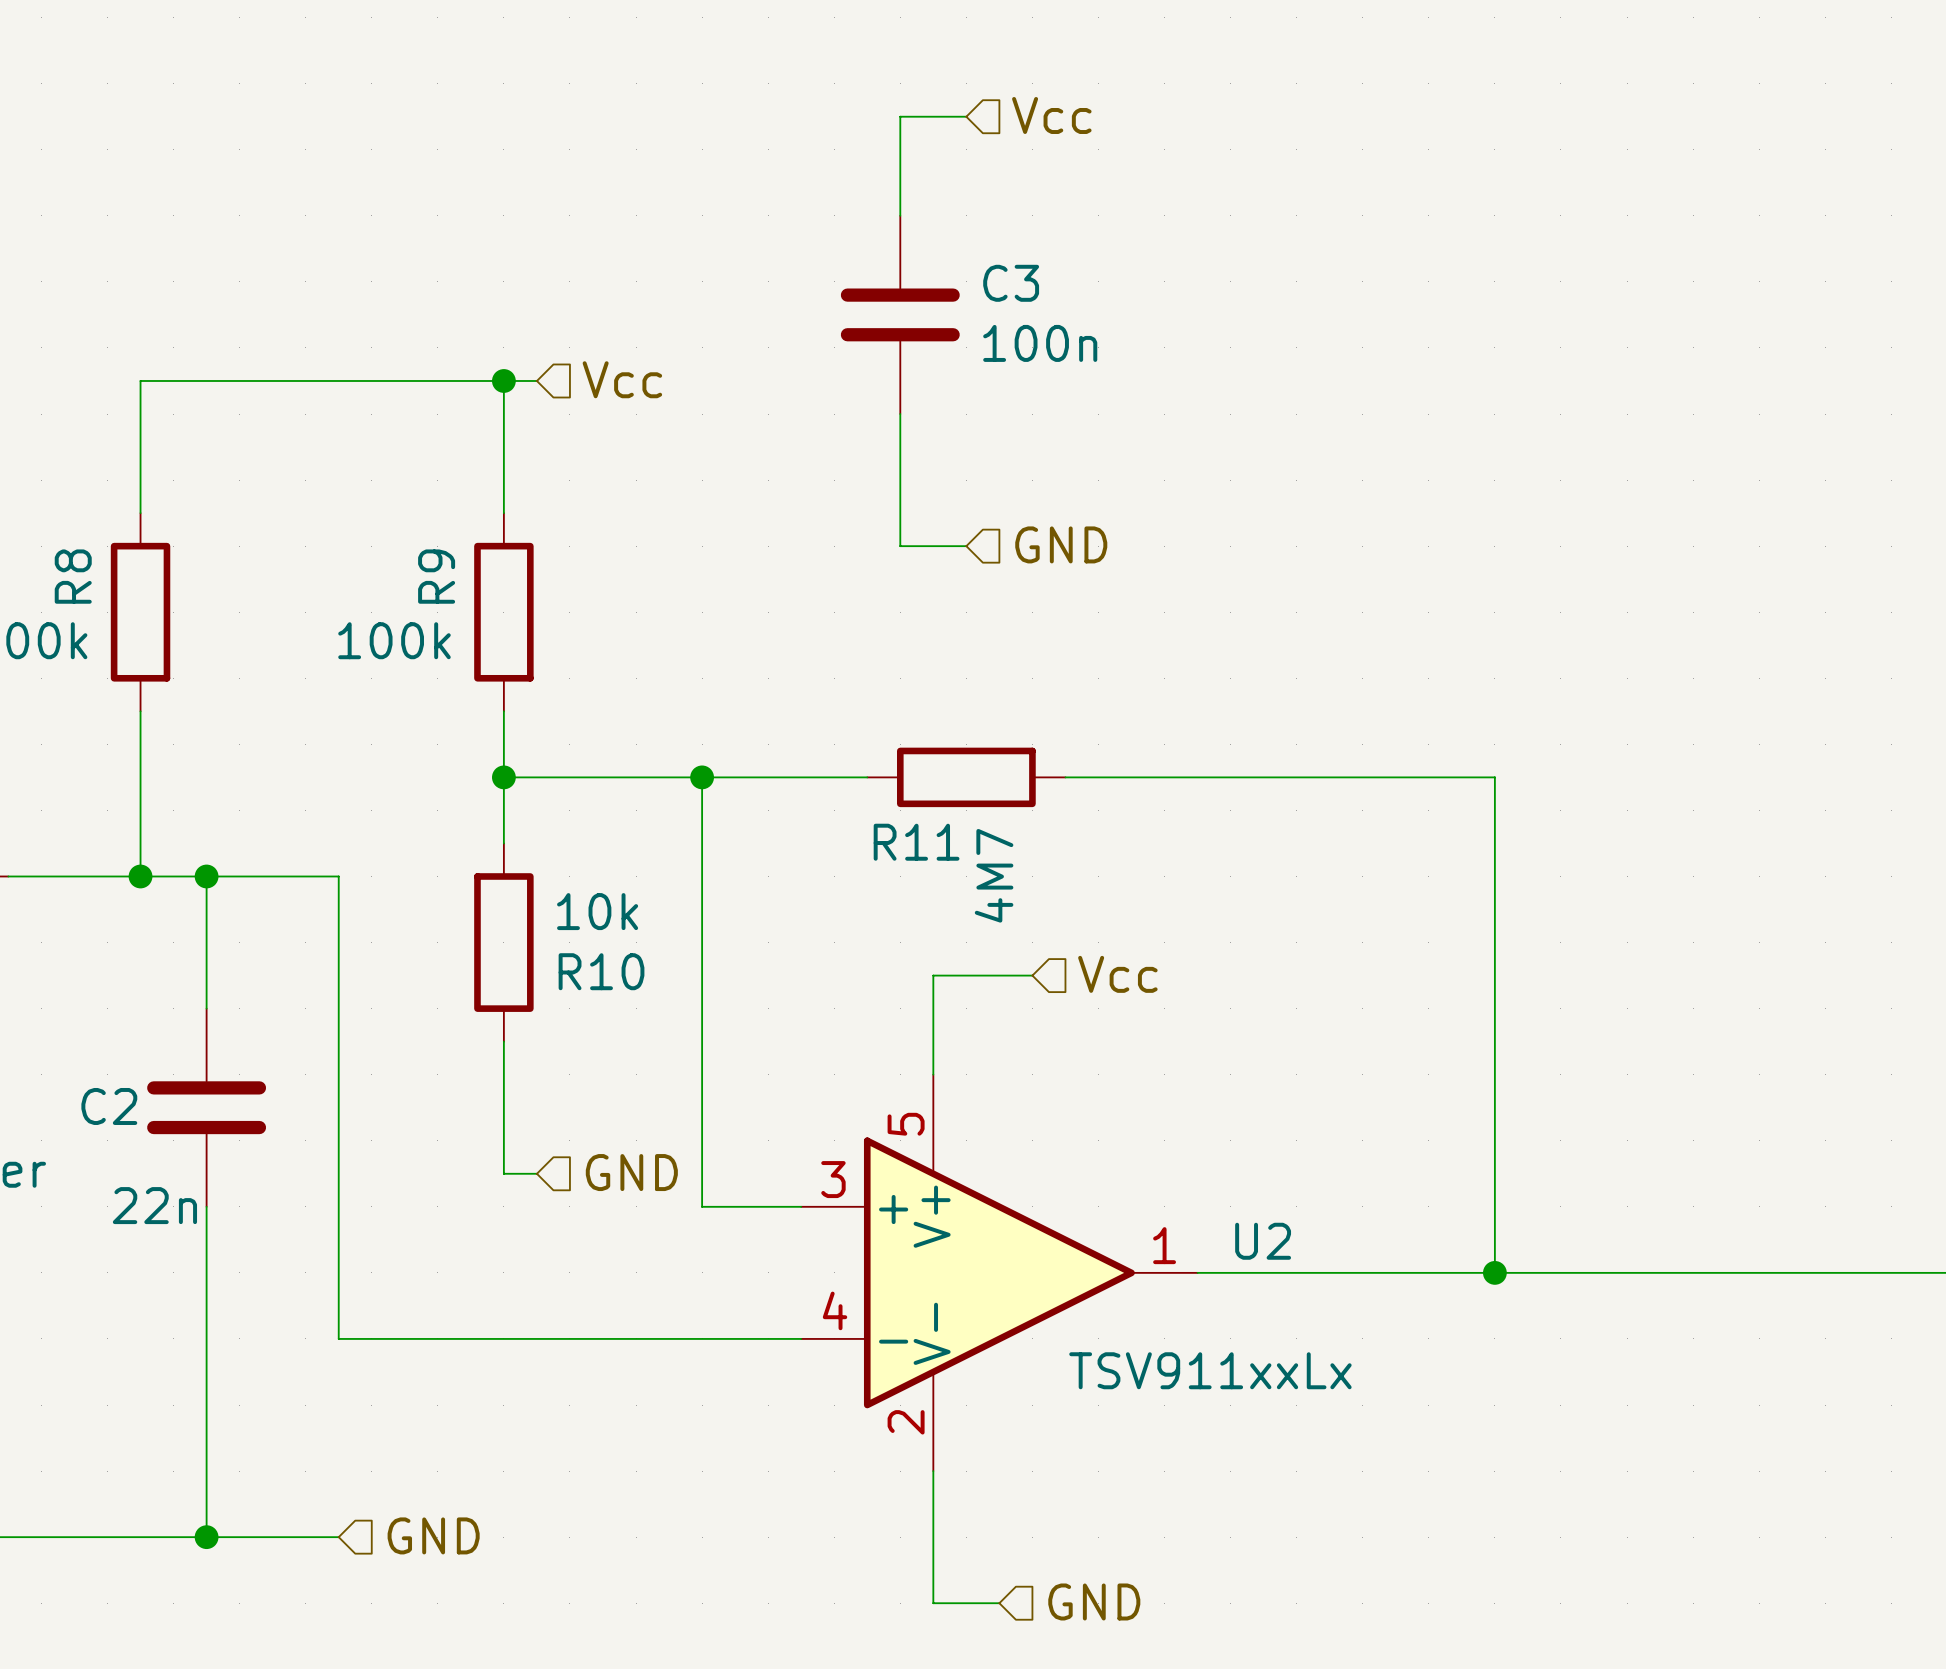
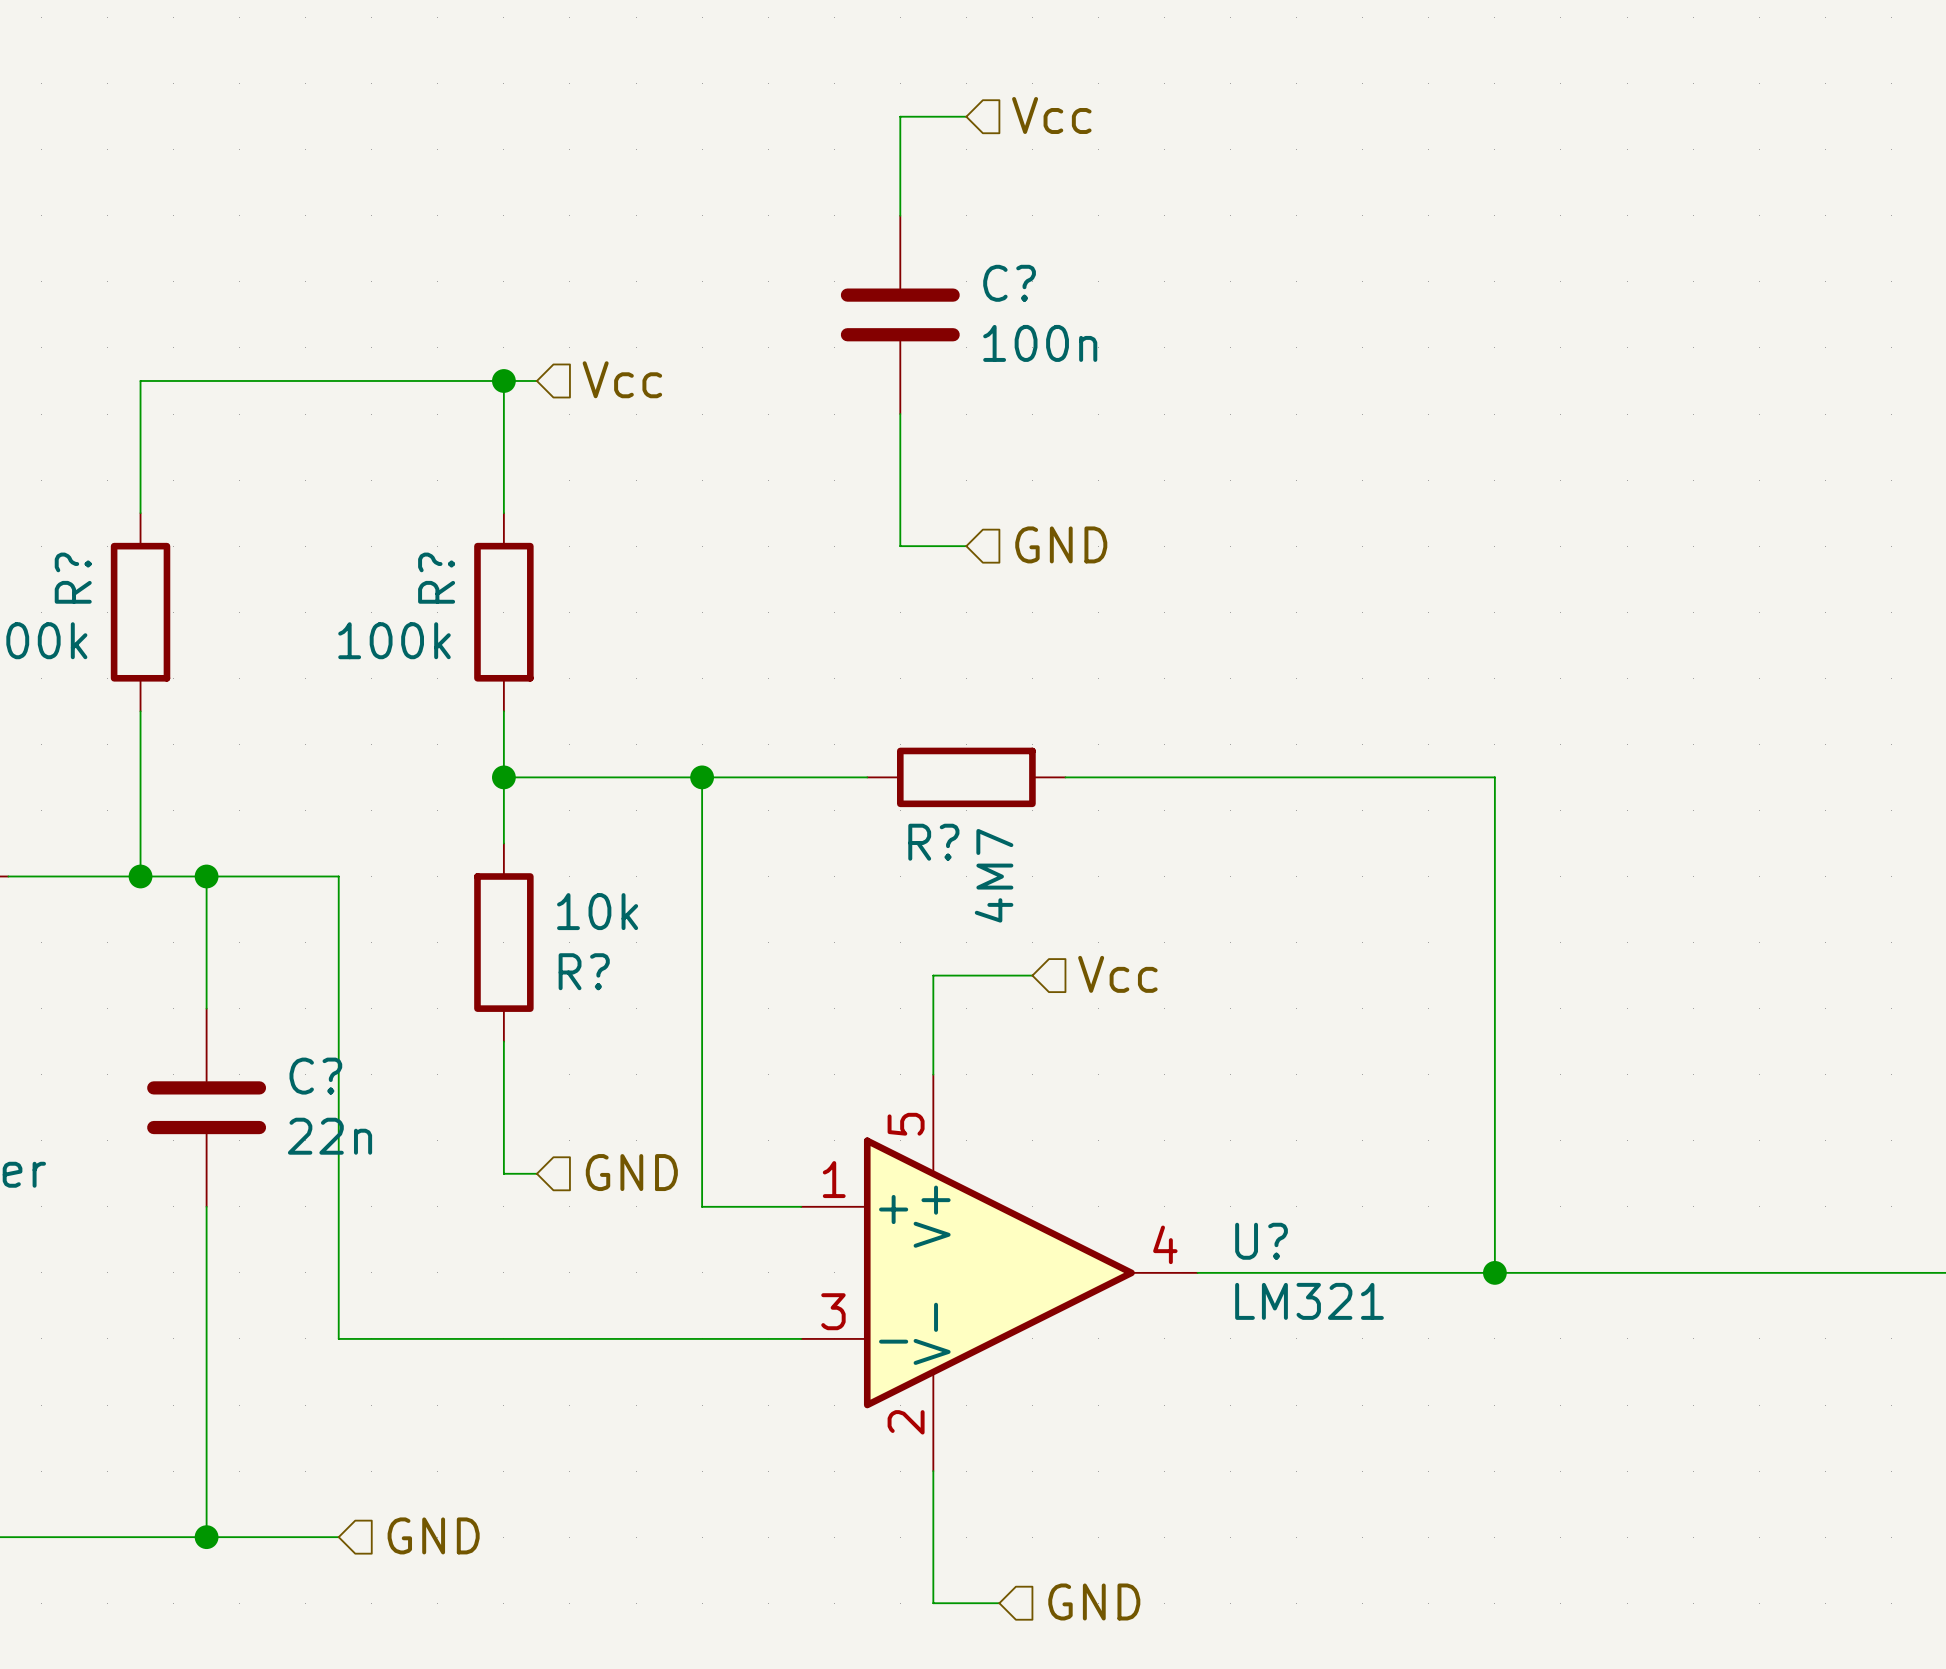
C3 name: C3 (1011, 283) -> C? (1009, 283)
R8 name: R8 (73, 576) -> R? (73, 578)
R9 name: R9 (436, 576) -> R? (436, 578)
R11 name: R11 (916, 842) -> R? (933, 842)
R10 name: R10 (601, 971) -> R? (584, 971)
C2 name: C2 (109, 1106) -> C? (315, 1076)
U2 pin number: 3 (833, 1179) -> 1 (834, 1179)
C2 value position: 22n (154, 1205) -> 22n (330, 1136)
U2 name: U2 (1263, 1241) -> U? (1261, 1241)
U2 pin number: 1 (1164, 1245) -> 4 (1165, 1244)
U2 pin number: 4 (835, 1310) -> 3 (833, 1311)
U2 value: TSV911xxLx (1210, 1370) -> LM321 (1309, 1301)

